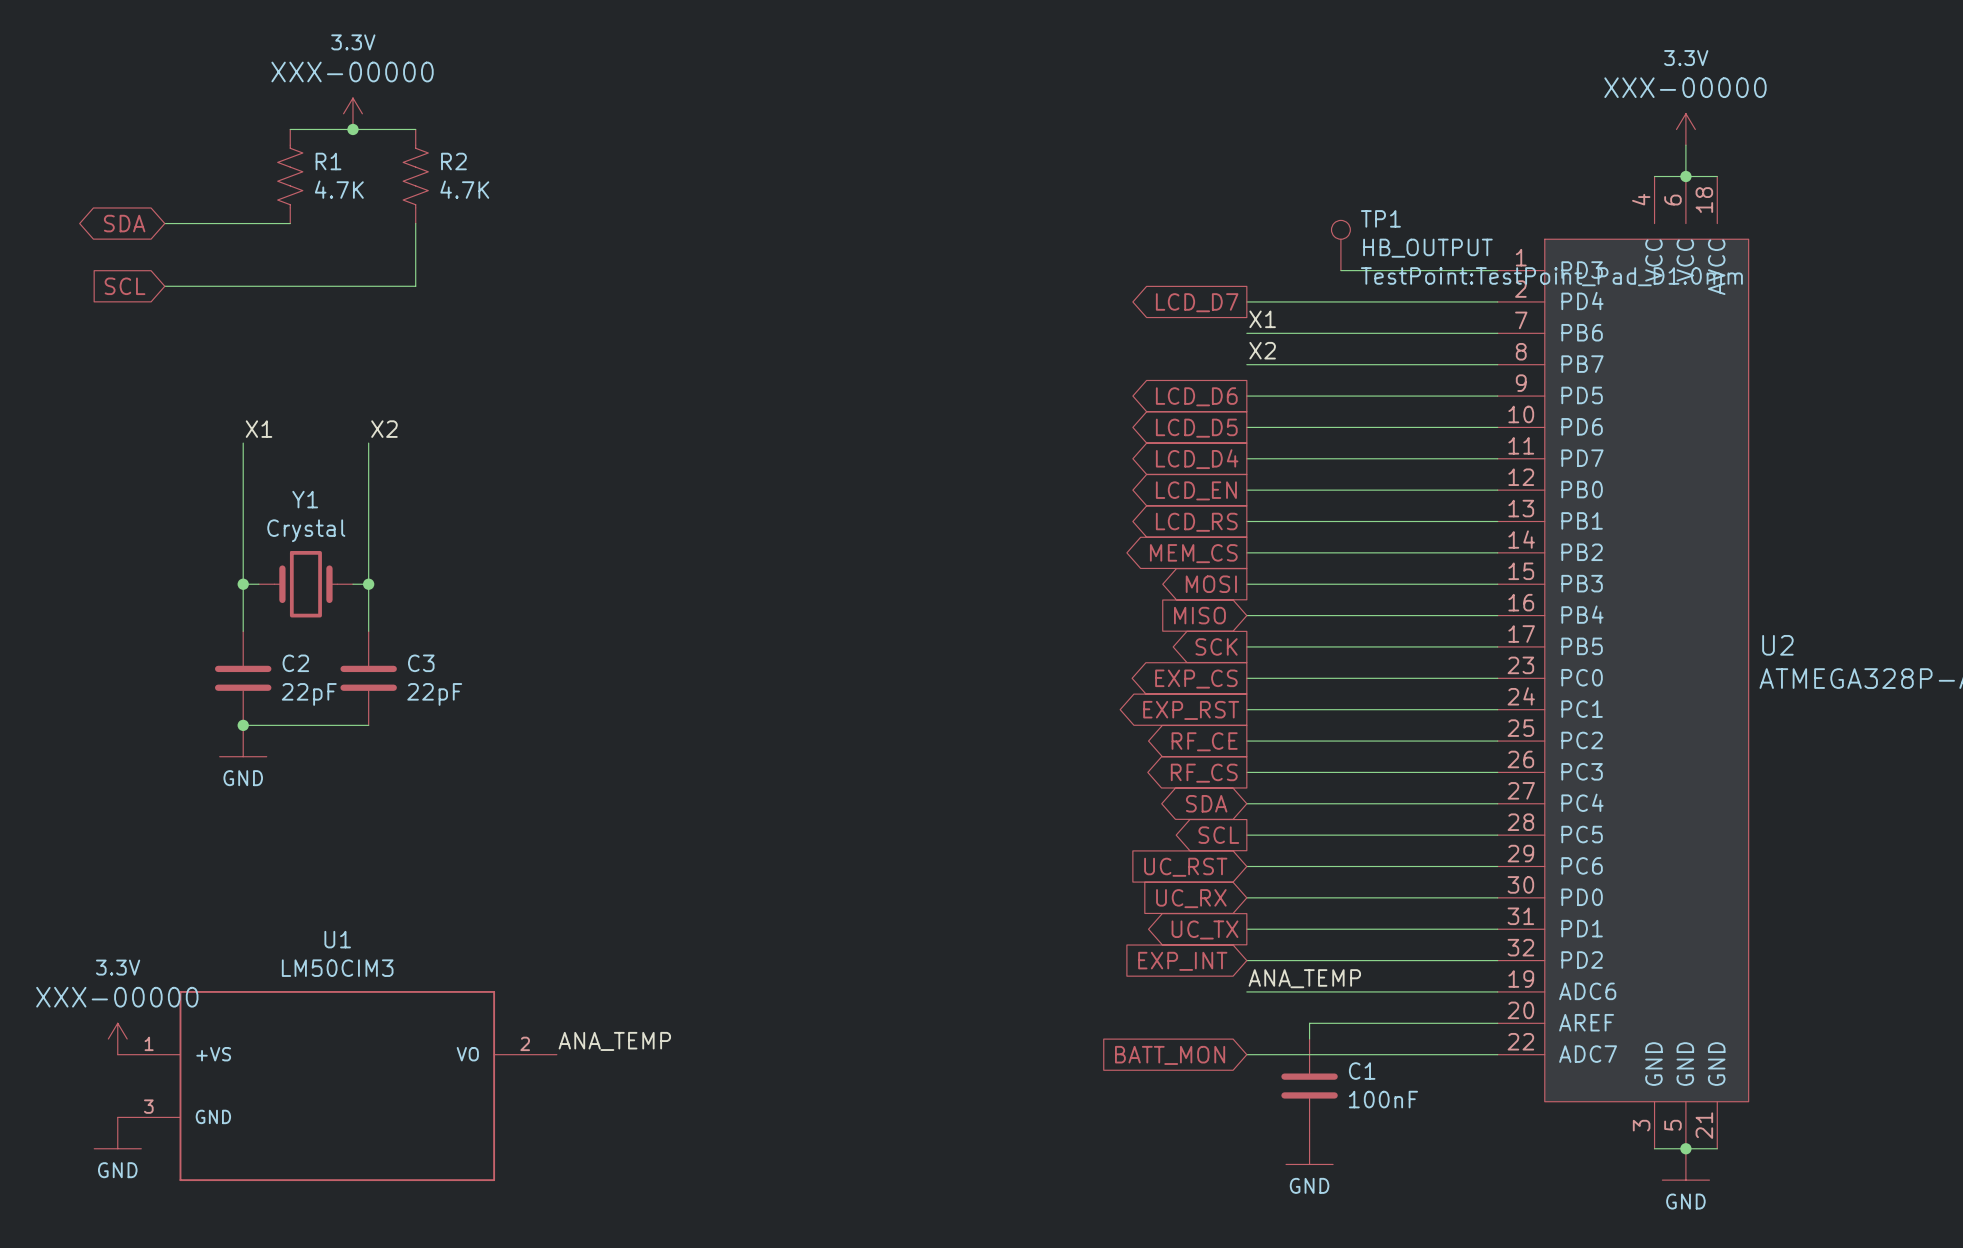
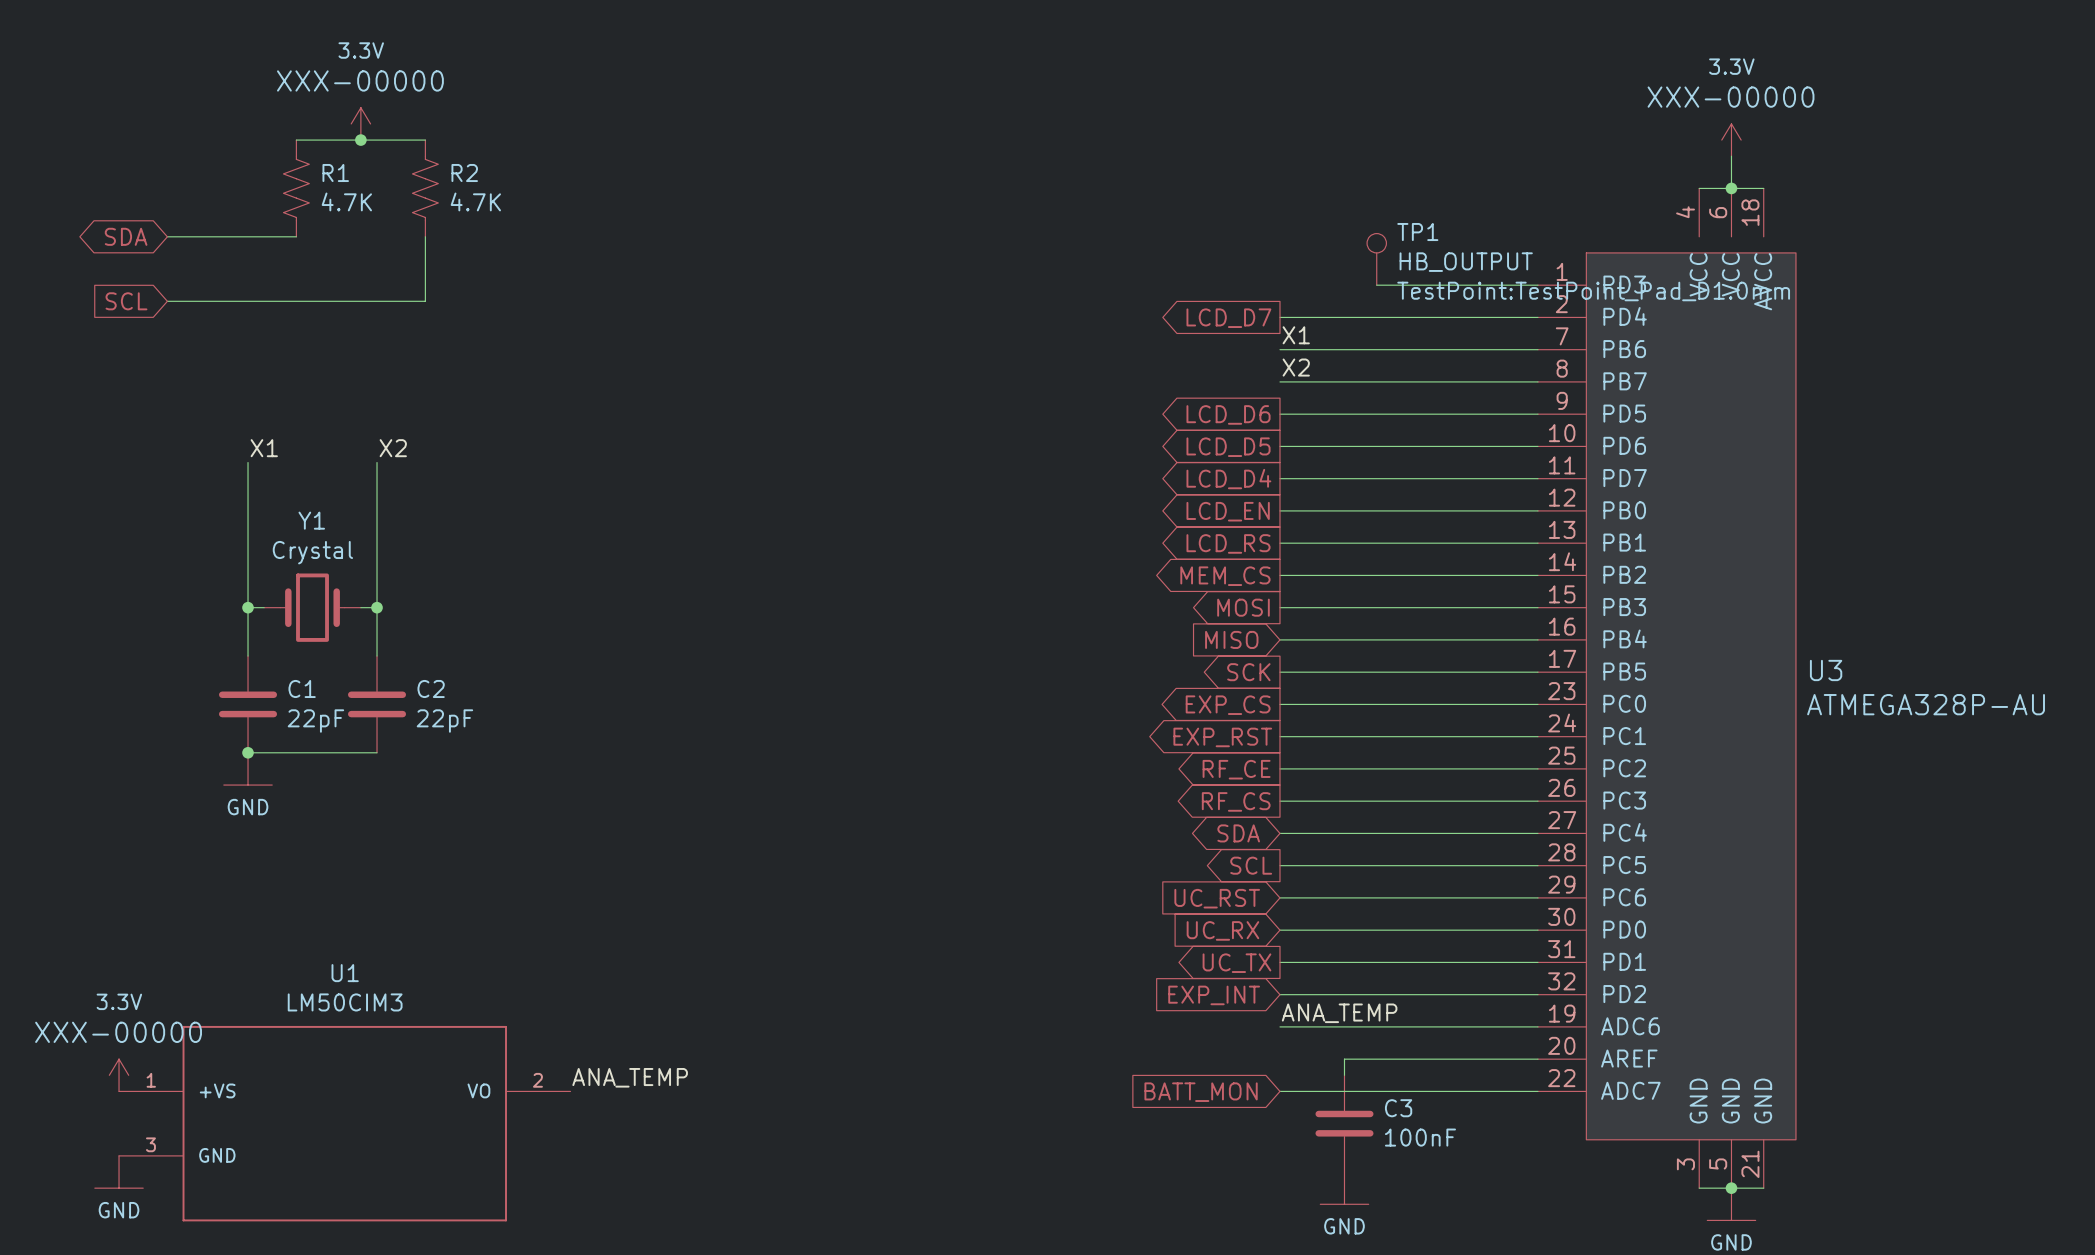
U2 name: U2 (1777, 645) -> U3 (1826, 670)
C2 name: C2 (295, 663) -> C1 (302, 688)
C3 name: C3 (421, 663) -> C2 (431, 688)
C1 name: C1 (1362, 1071) -> C3 (1398, 1108)

